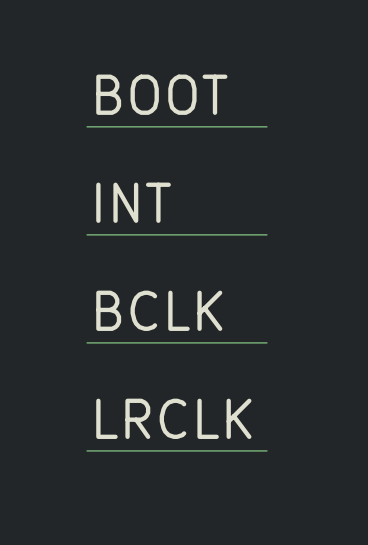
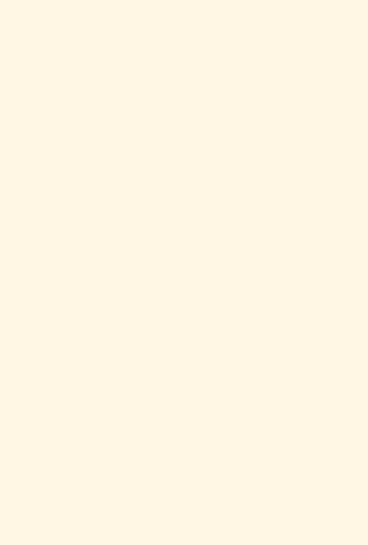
label: BOOT (161, 94) -> none
wire: (86, 126) (267, 126) -> none
label: INT (133, 202) -> none
wire: (86, 234) (267, 234) -> none
label: BCLK (159, 310) -> none
wire: (86, 342) (267, 342) -> none
label: LRCLK (173, 418) -> none
wire: (86, 450) (267, 450) -> none

